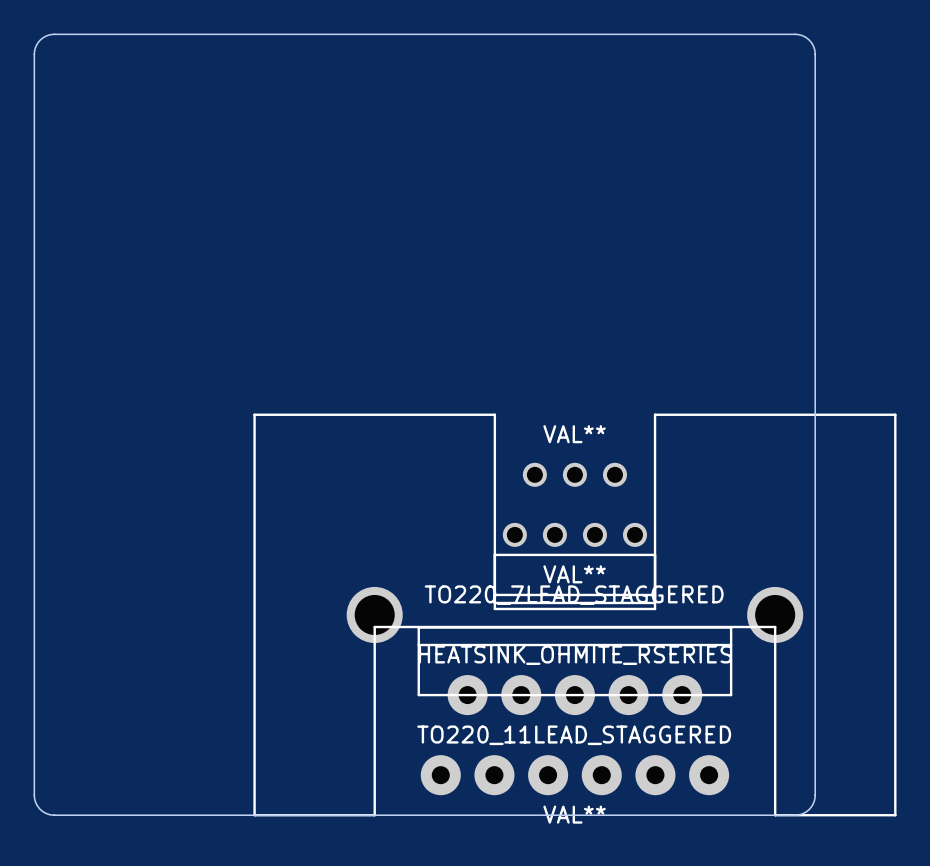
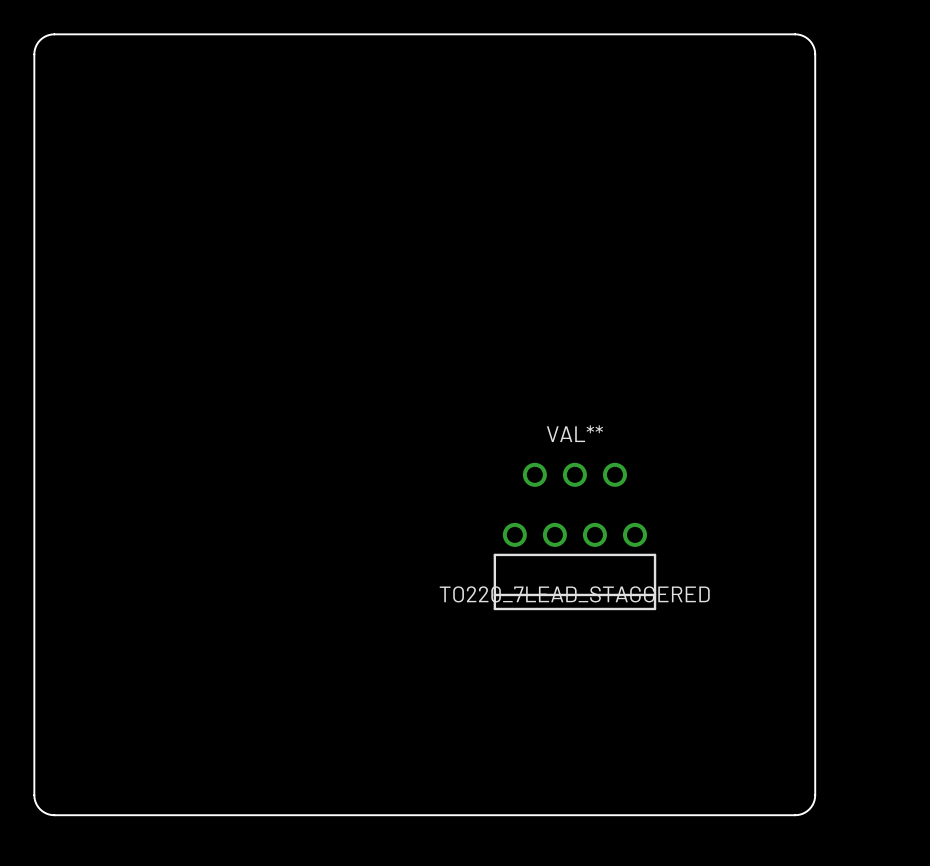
HEATSINK_OHMITE_RSERIES: VAL** (574, 614) -> none
TO220_11LEAD_STAGGERED: VAL** (574, 710) -> none

